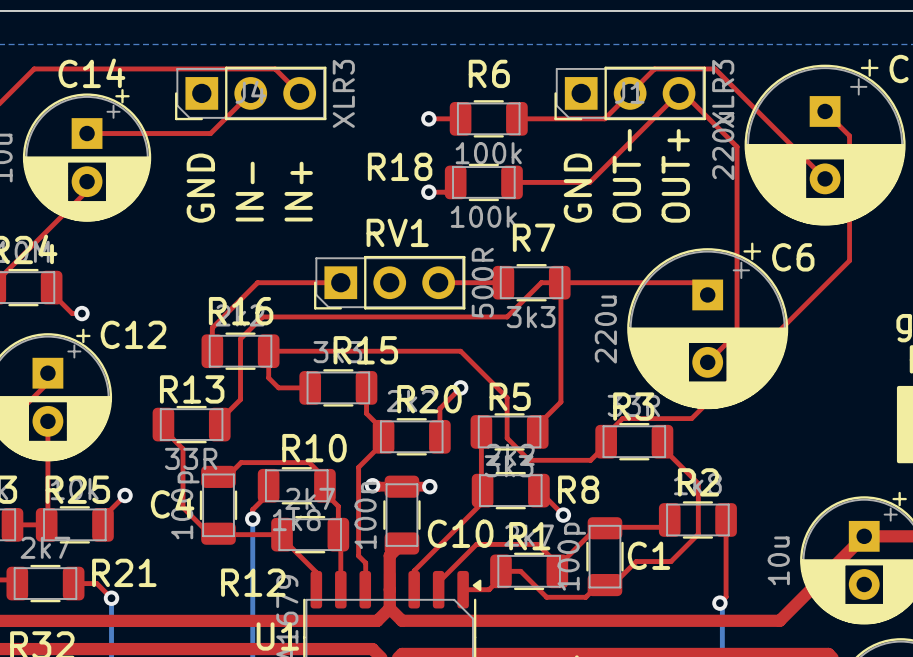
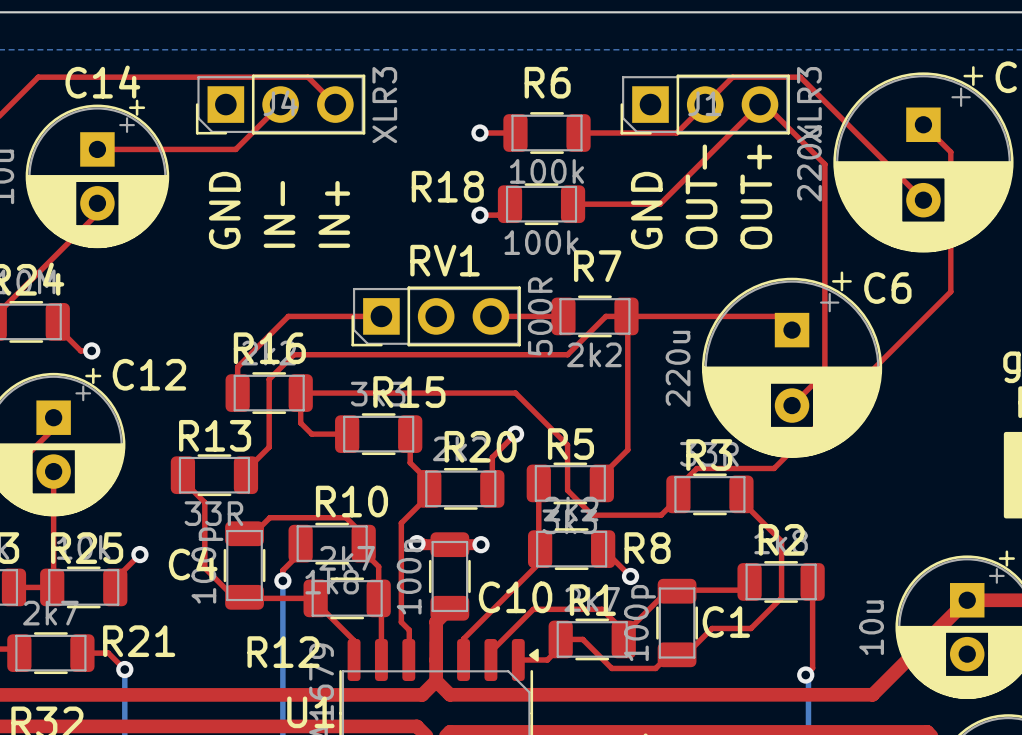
R7 value: 3k3 (531, 317) -> 2k2 (594, 354)

